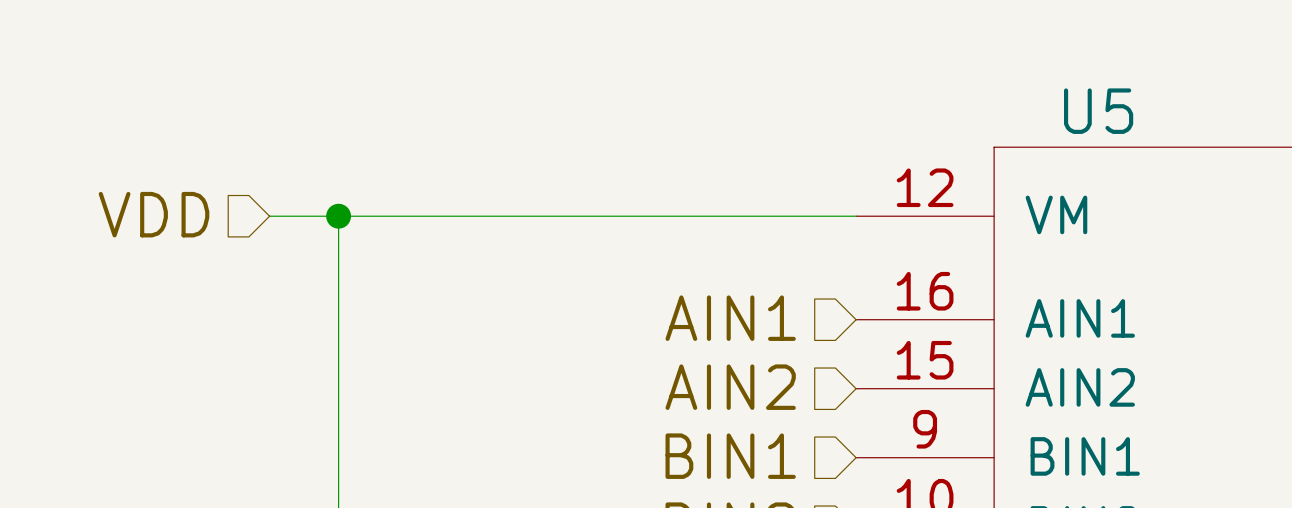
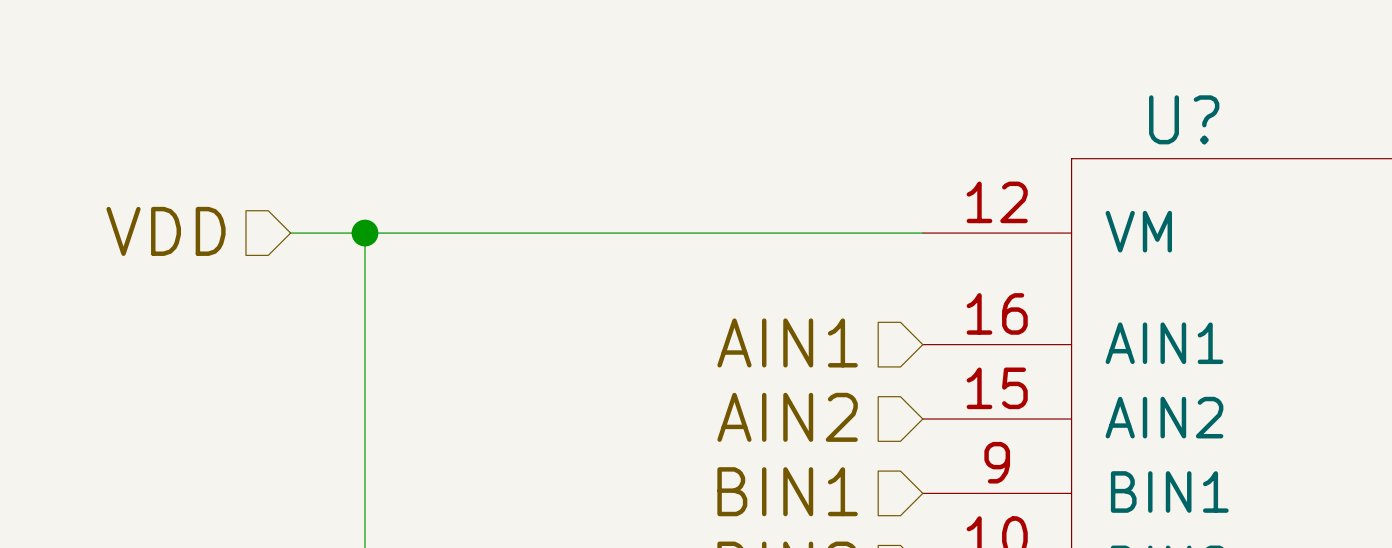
U5 name: U5 (1098, 111) -> U? (1184, 119)

